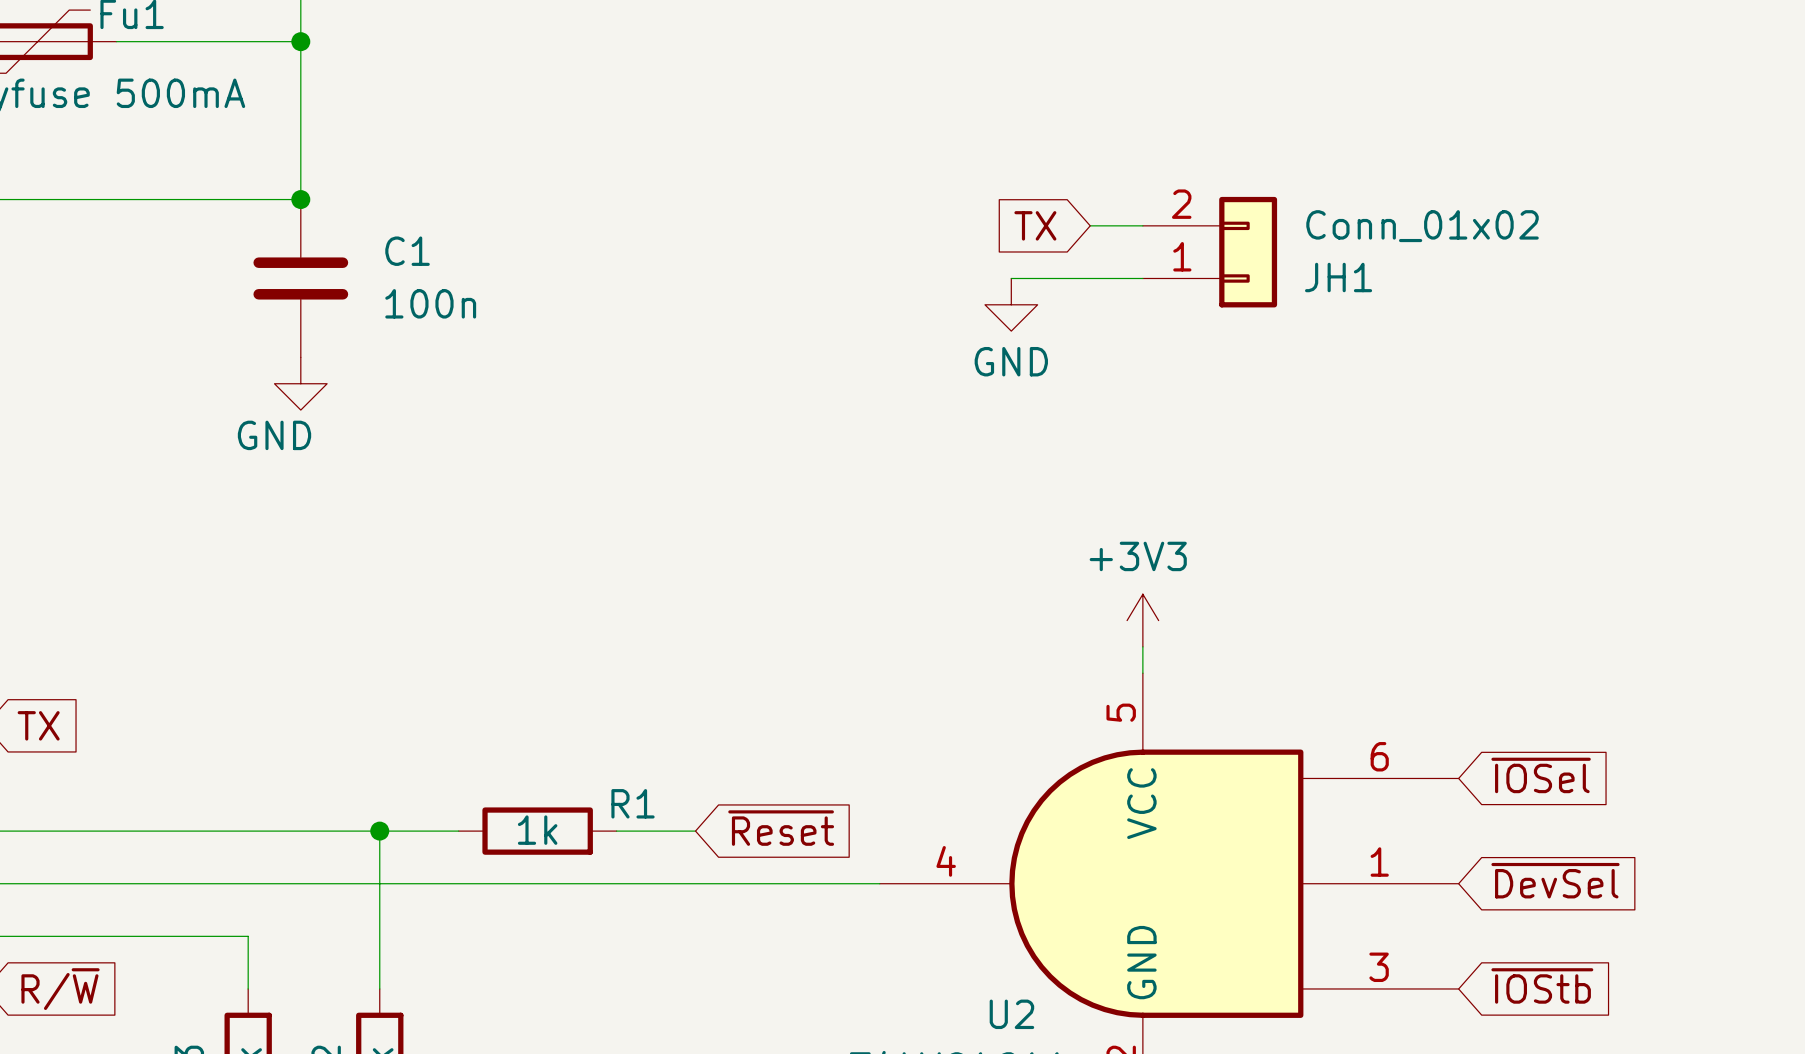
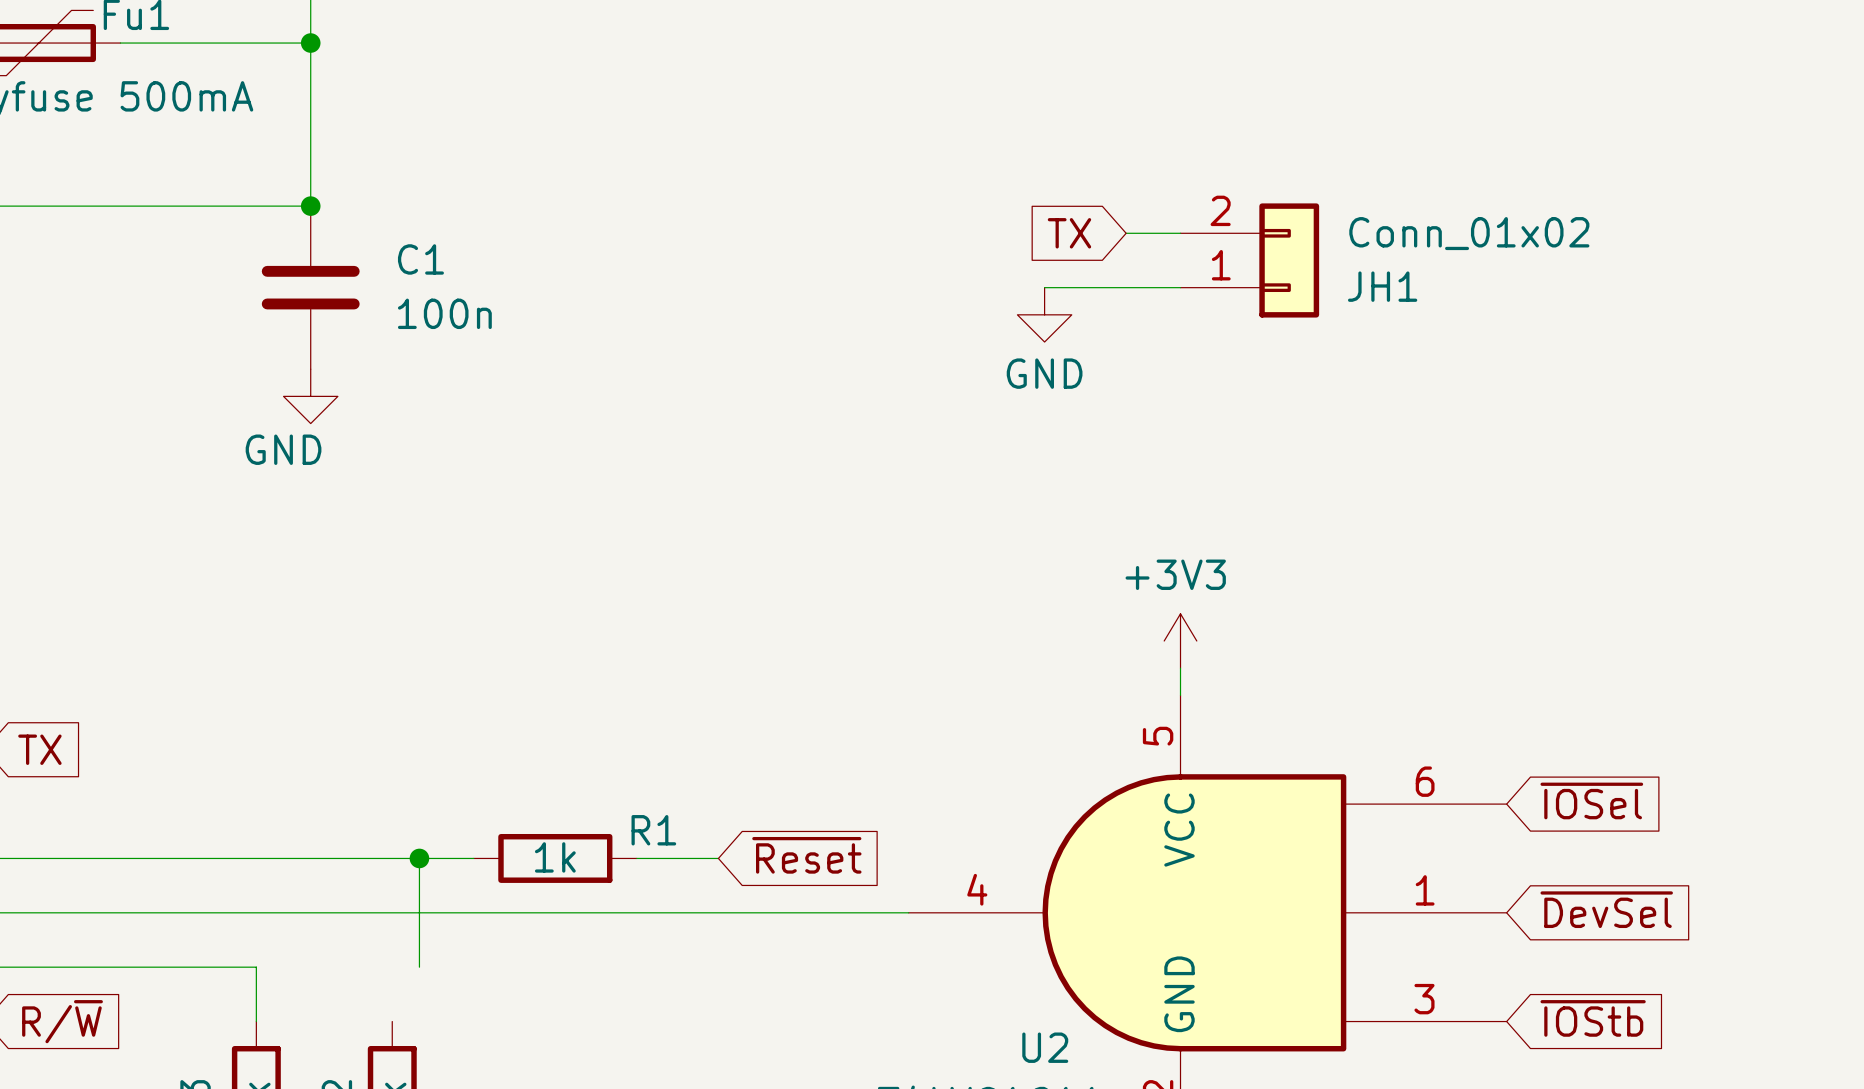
wire: (379, 831) (379, 988) -> none
junction position: (379, 831) -> (419, 858)
wire: none -> (419, 858) (419, 967)

